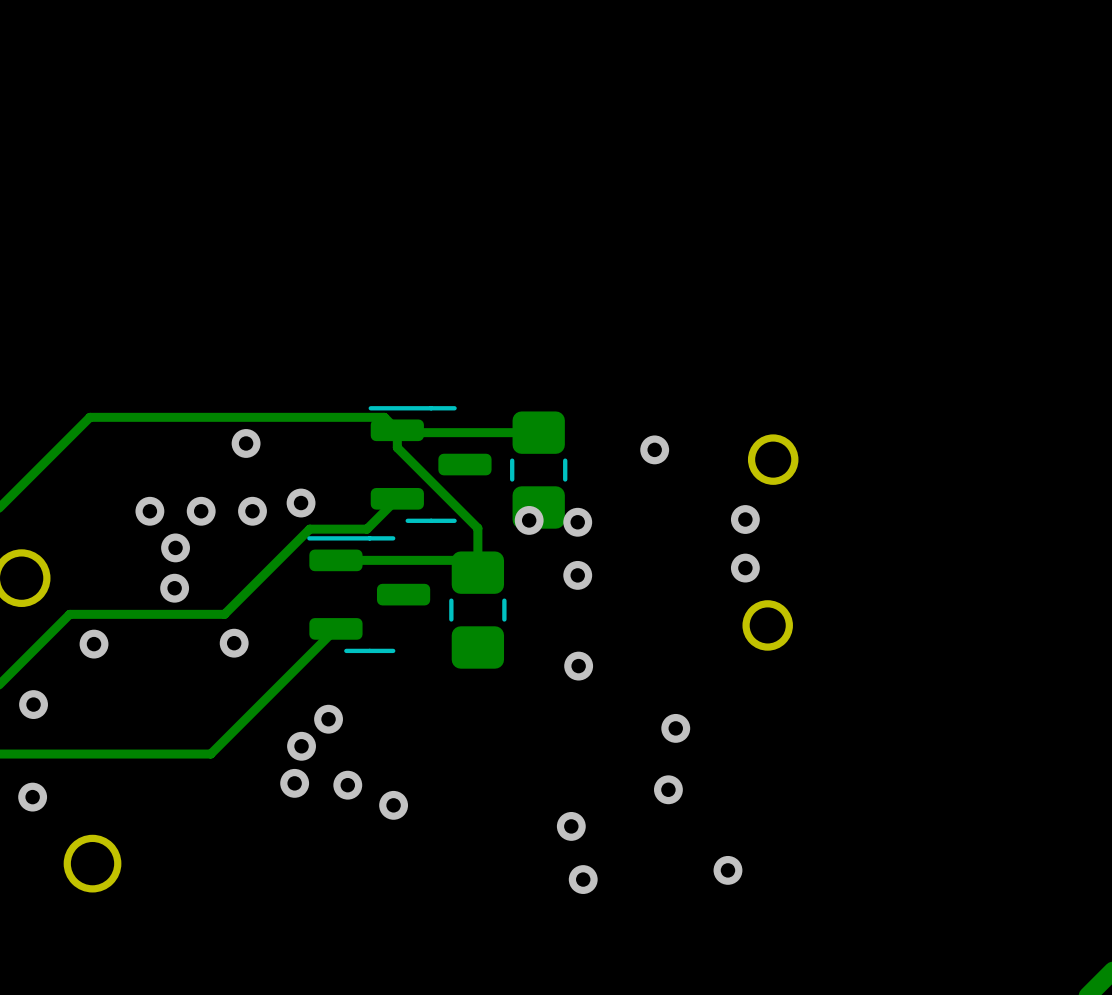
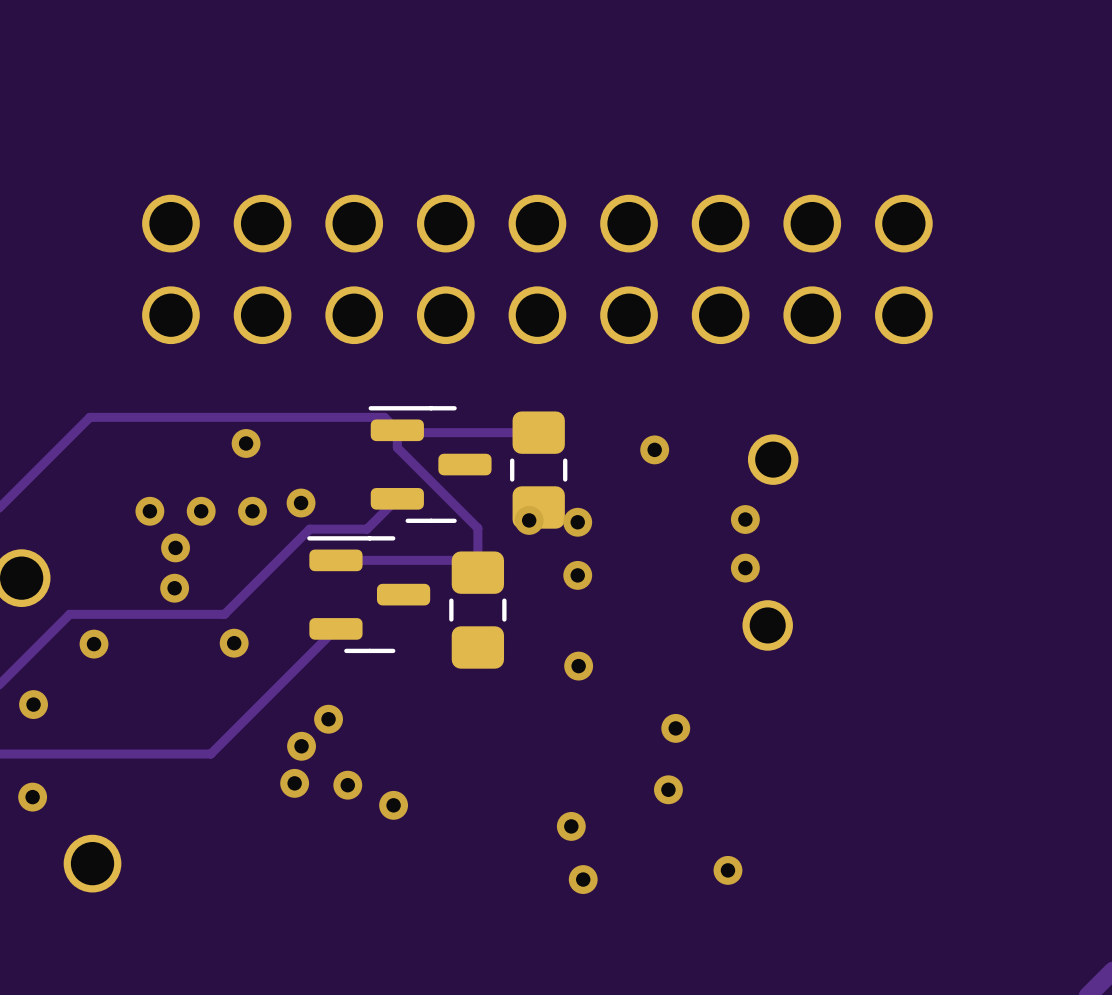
part: none -> (170, 223)
part: none -> (262, 223)
part: none -> (354, 223)
part: none -> (445, 223)
part: none -> (537, 223)
part: none -> (629, 223)
part: none -> (720, 223)
part: none -> (812, 223)
part: none -> (903, 223)
part: none -> (170, 315)
part: none -> (262, 315)
part: none -> (354, 315)
part: none -> (445, 315)
part: none -> (537, 315)
part: none -> (629, 315)
part: none -> (720, 315)
part: none -> (812, 315)
part: none -> (903, 315)

